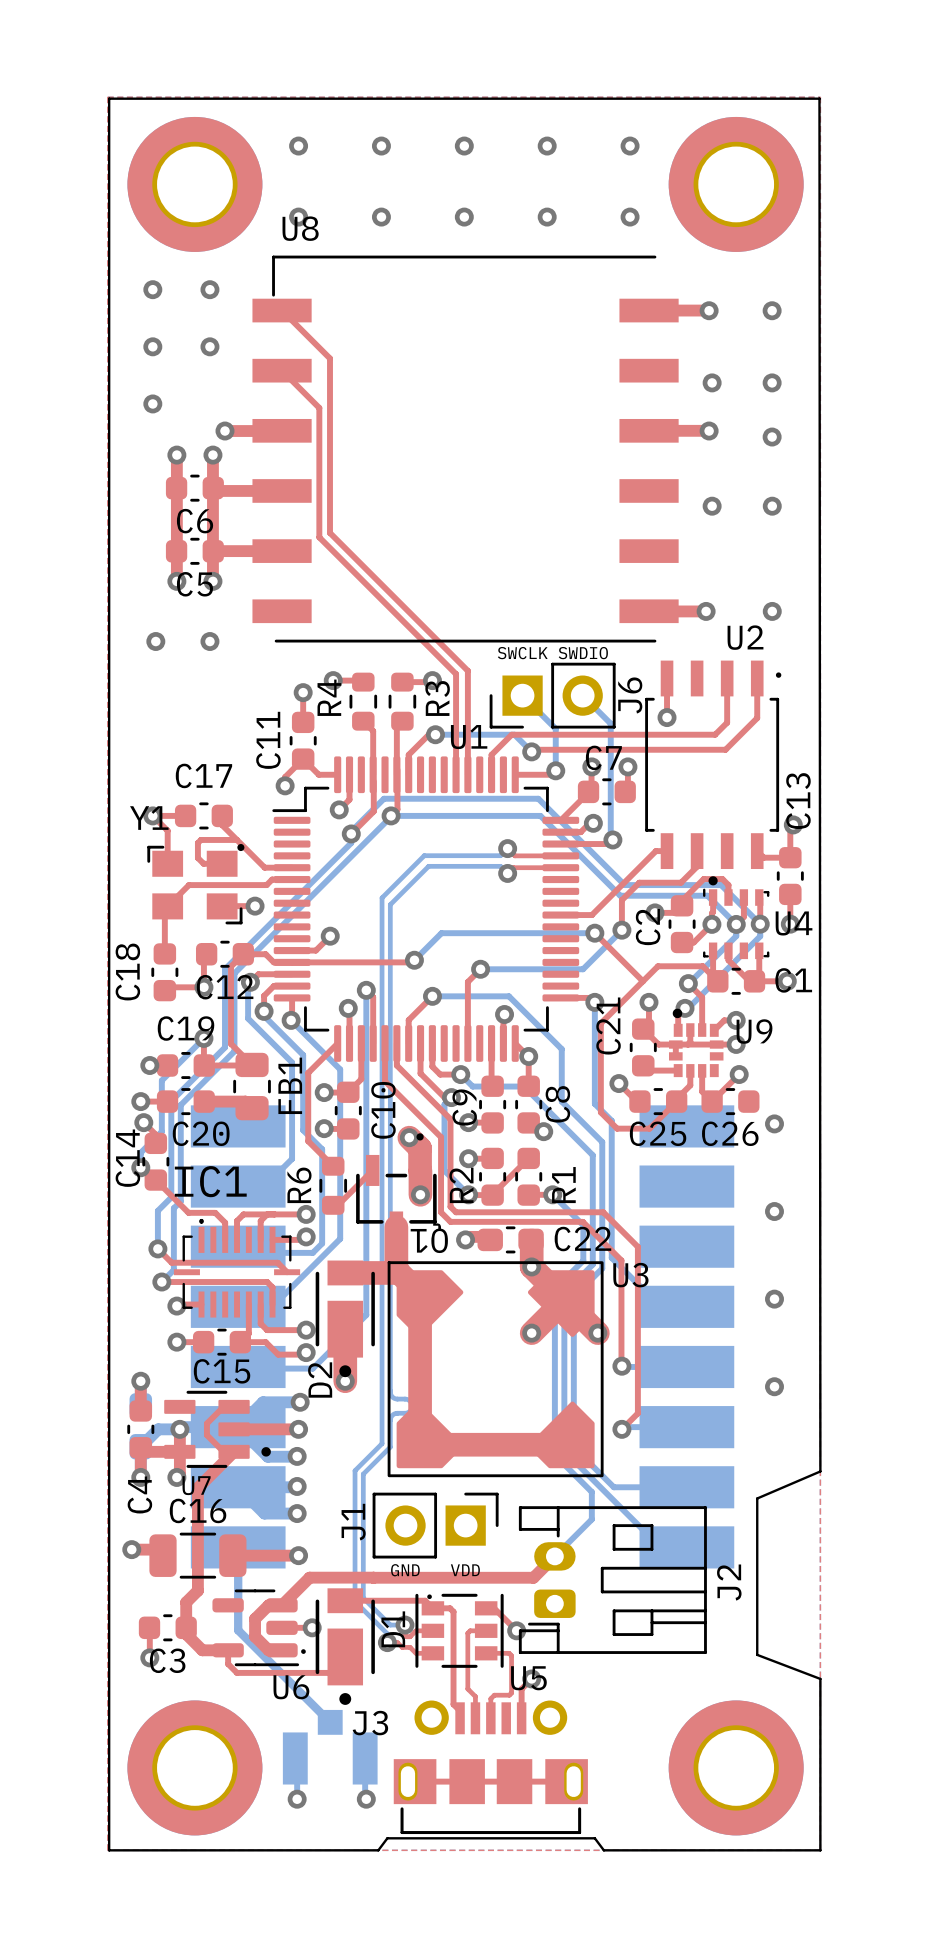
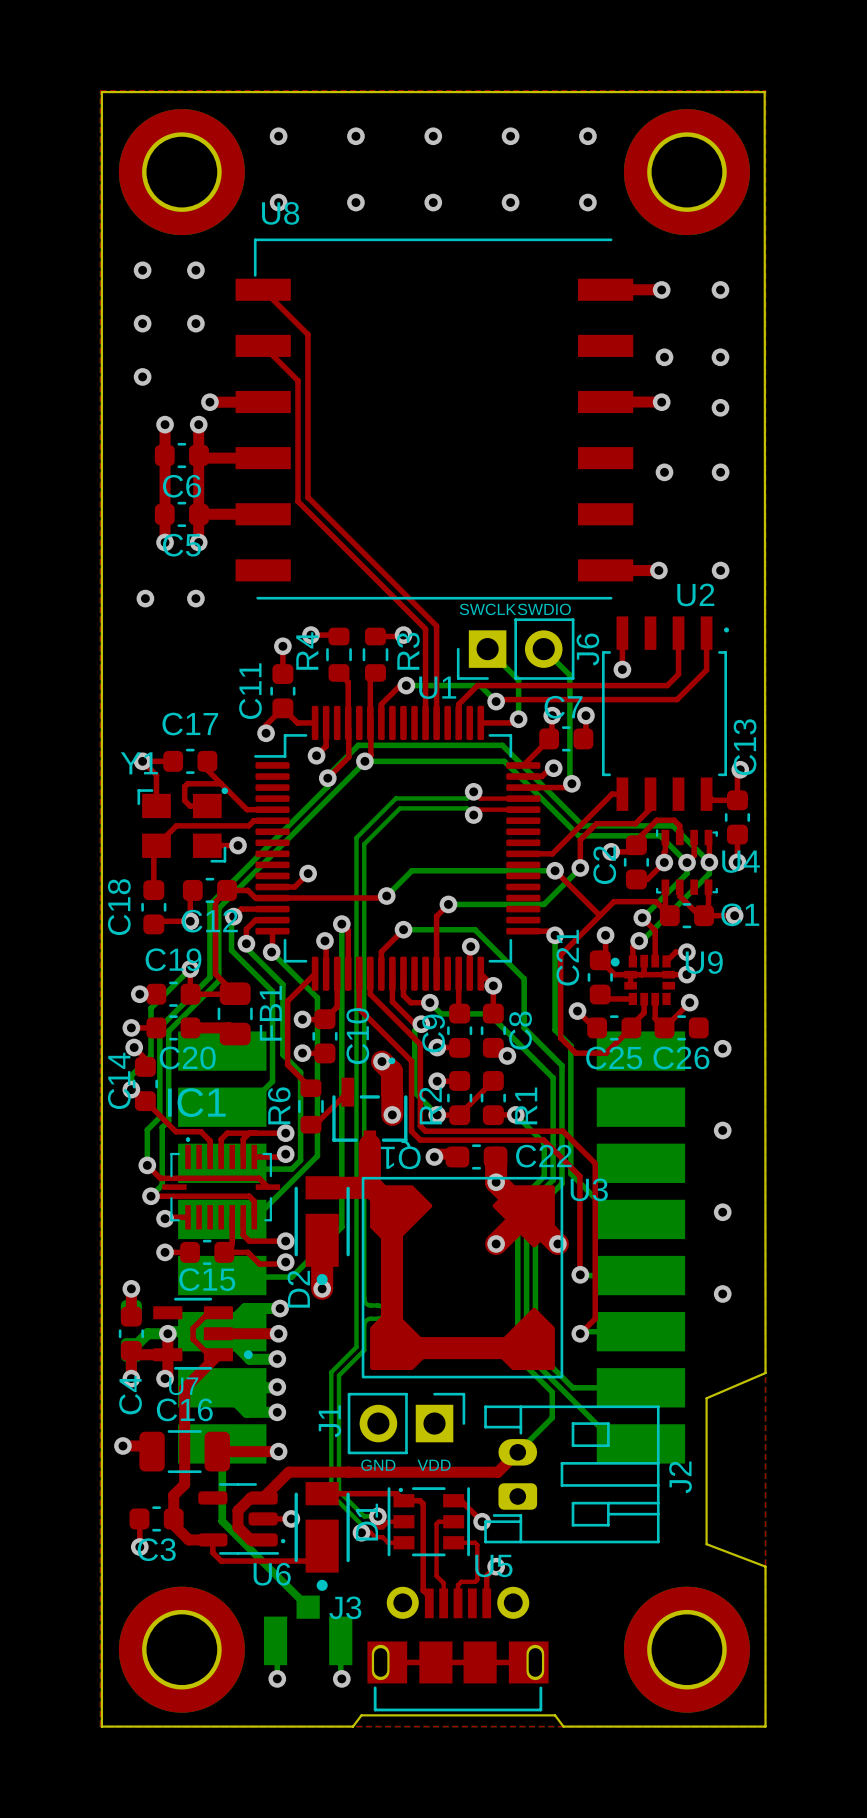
U4 footprint: [703, 876, 770, 960] -> [656, 829, 718, 895]
U9 footprint: [669, 1008, 724, 1078] -> [610, 954, 676, 1006]

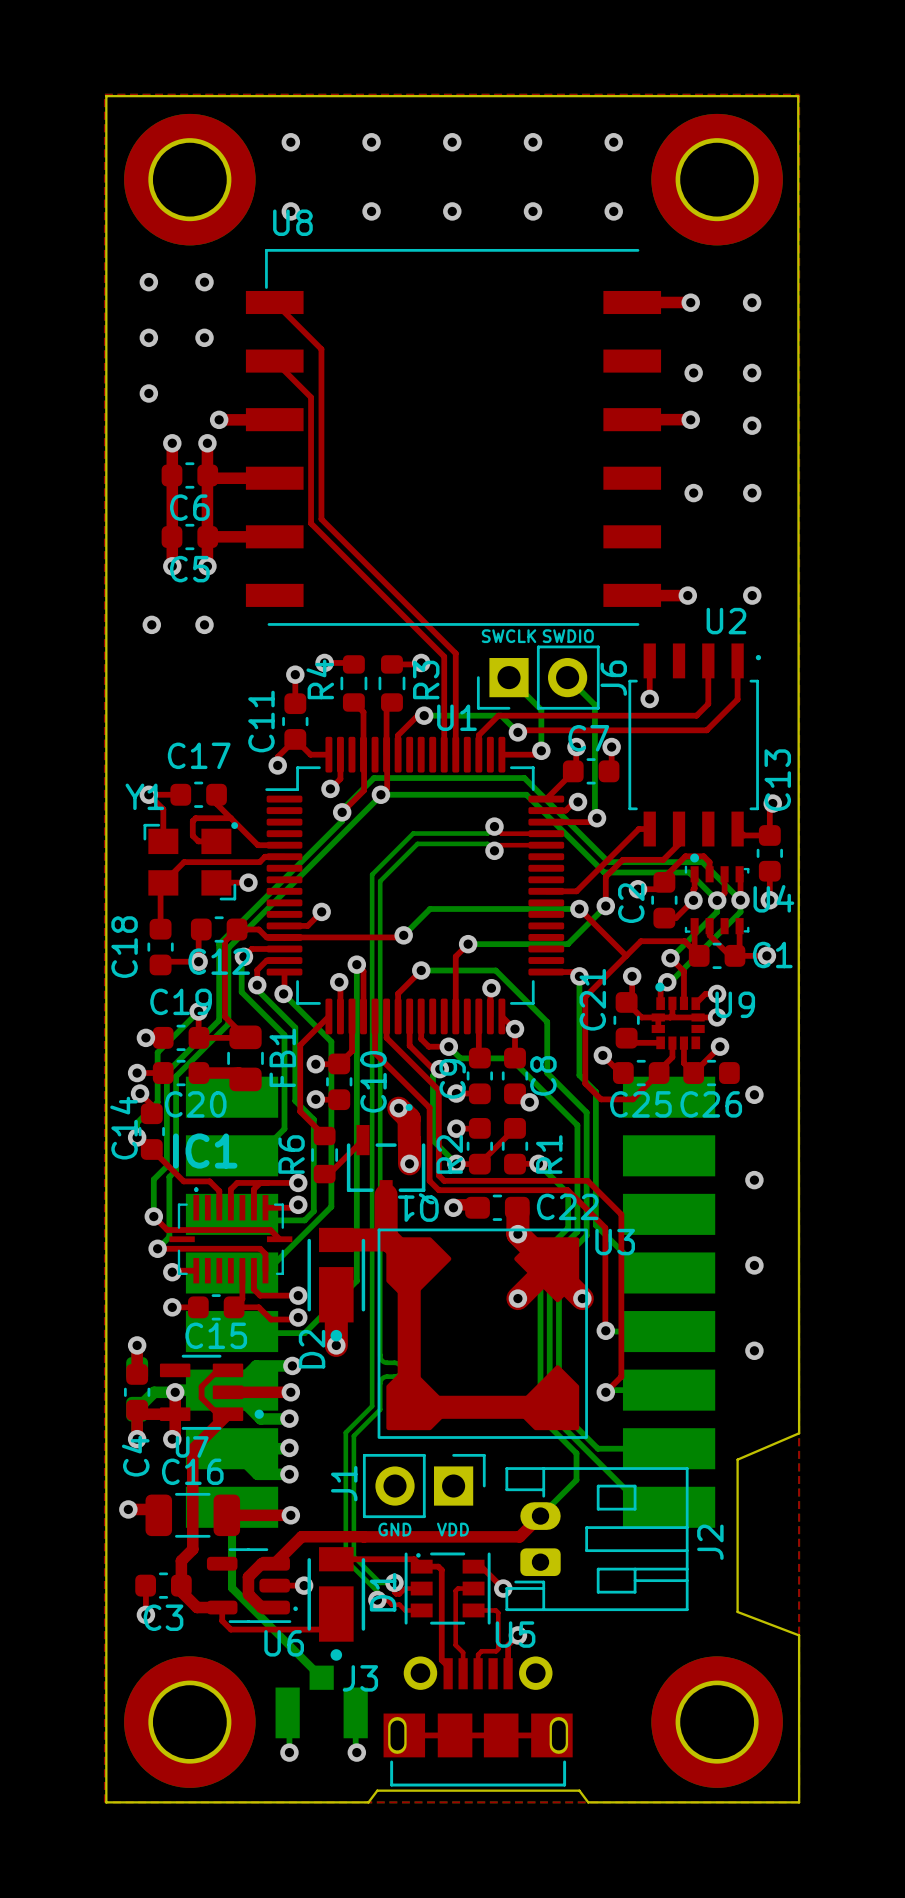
U4 footprint: [656, 829, 718, 895] -> [684, 853, 750, 935]
U9 footprint: [610, 954, 676, 1006] -> [651, 982, 705, 1050]

